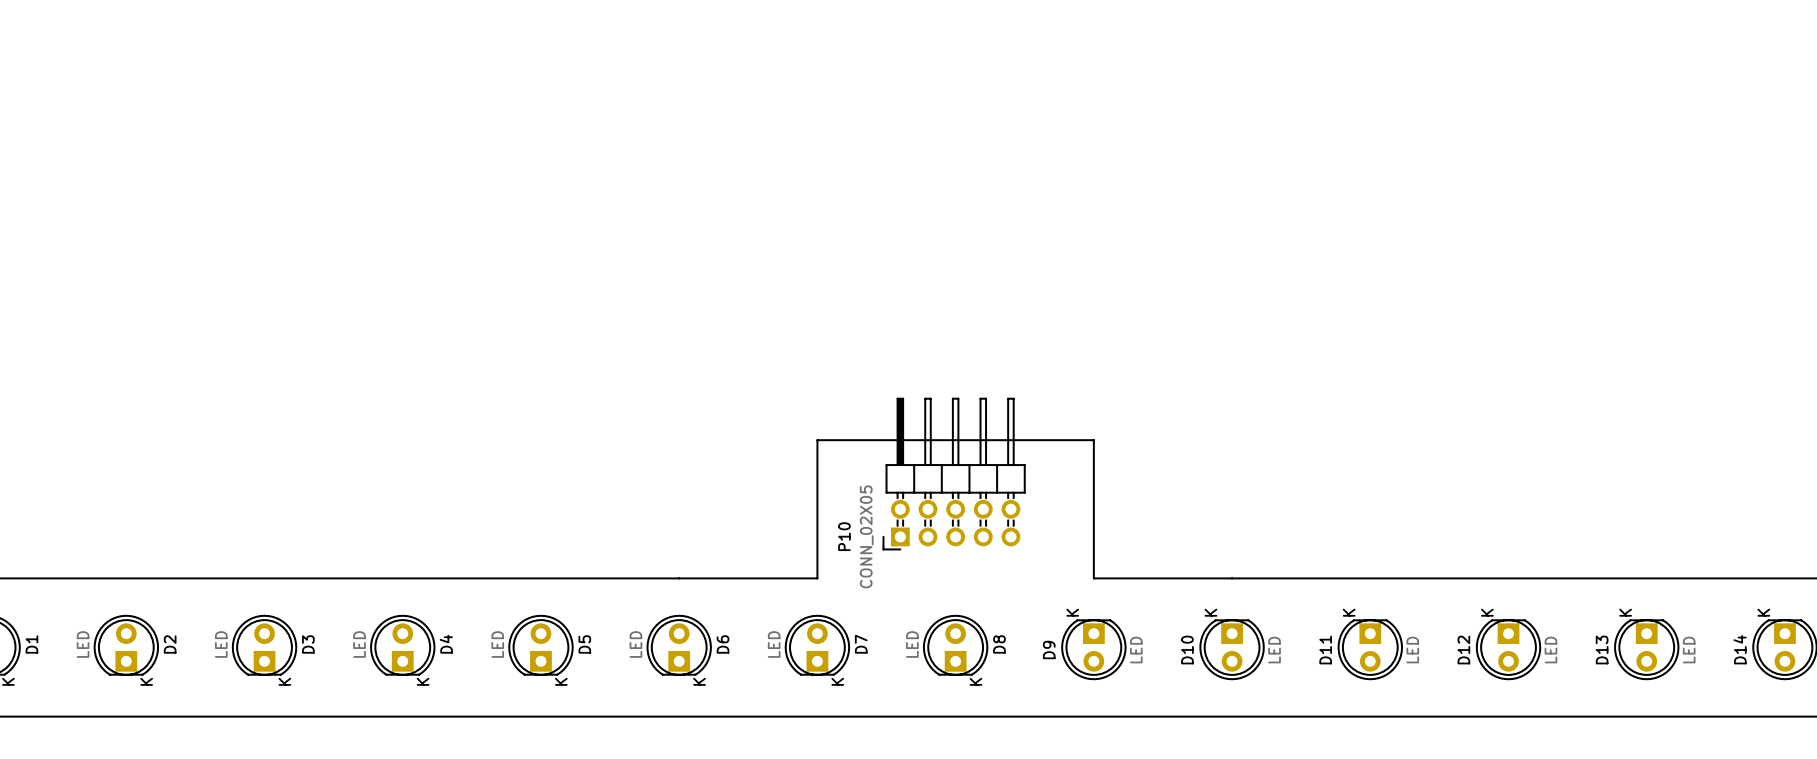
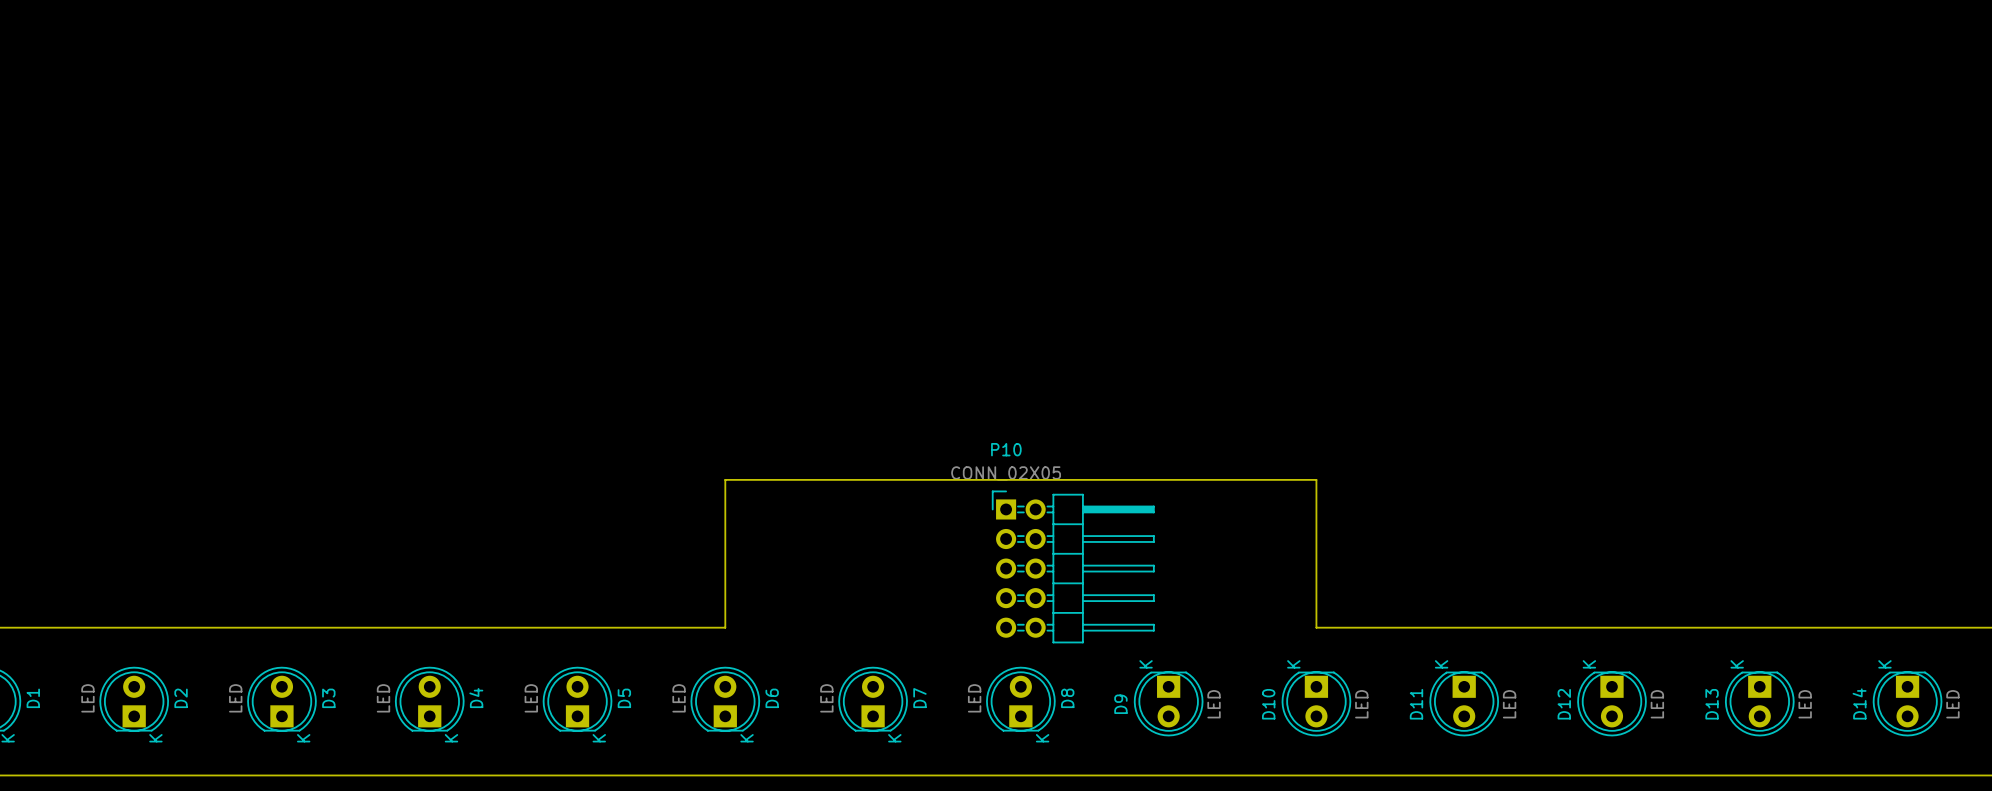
board edge: (817, 440) (817, 578) (679, 578) -> (873, 479) (725, 479) (725, 627)
board edge: (1093, 440) (1093, 578) (1232, 578) -> (1168, 479) (1316, 479) (1316, 627)
P10 rotation: 0° (954, 474) -> 90° clockwise (1073, 566)

